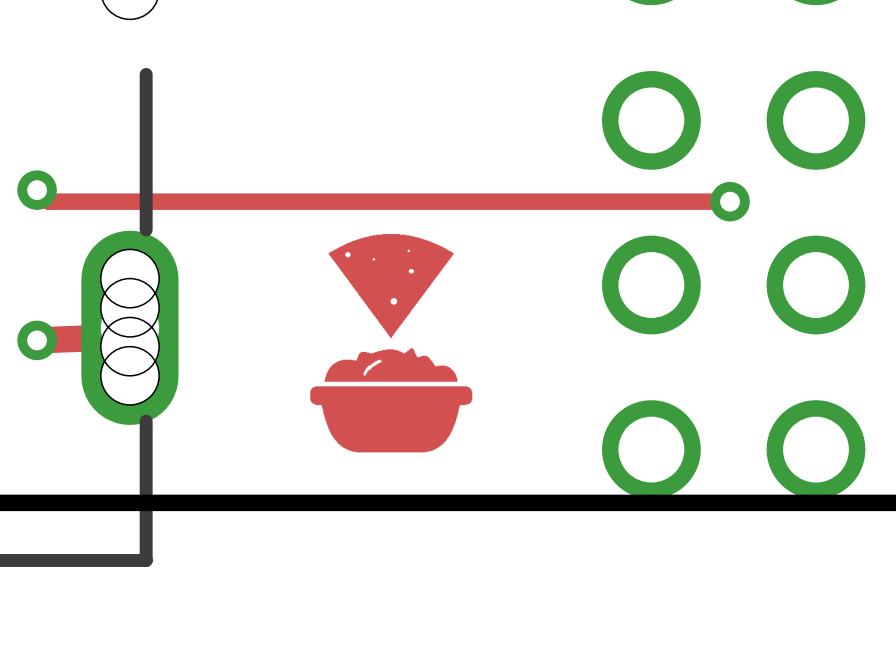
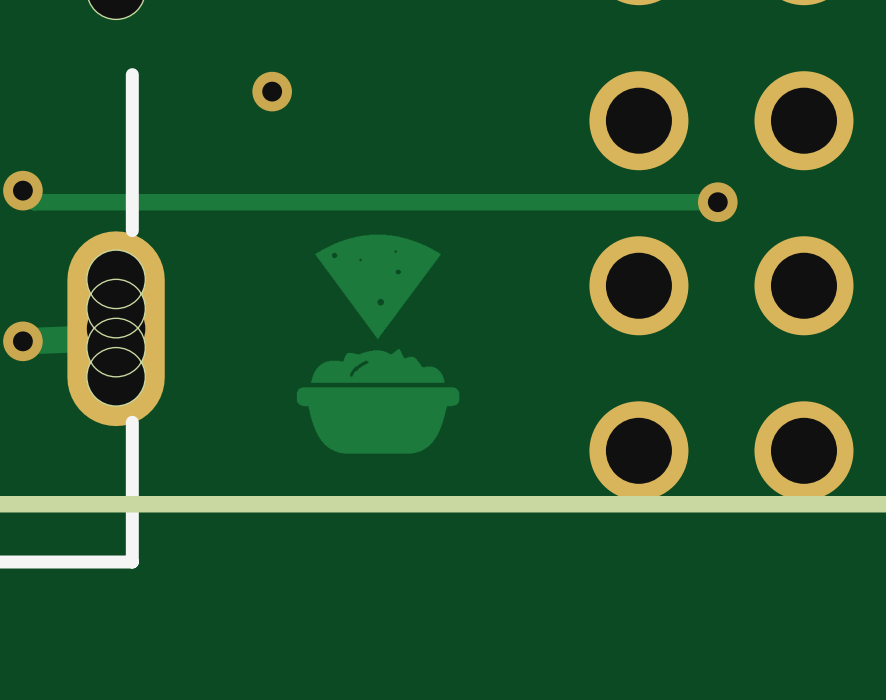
via: none -> (272, 91)

